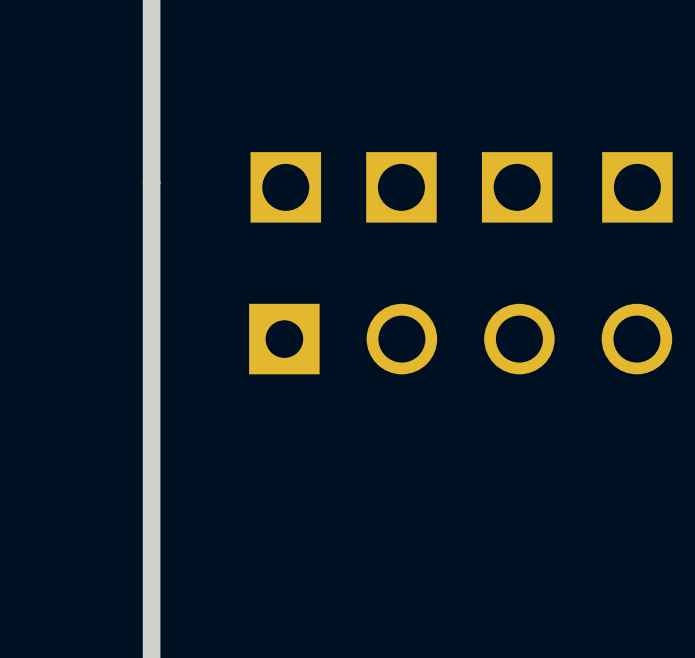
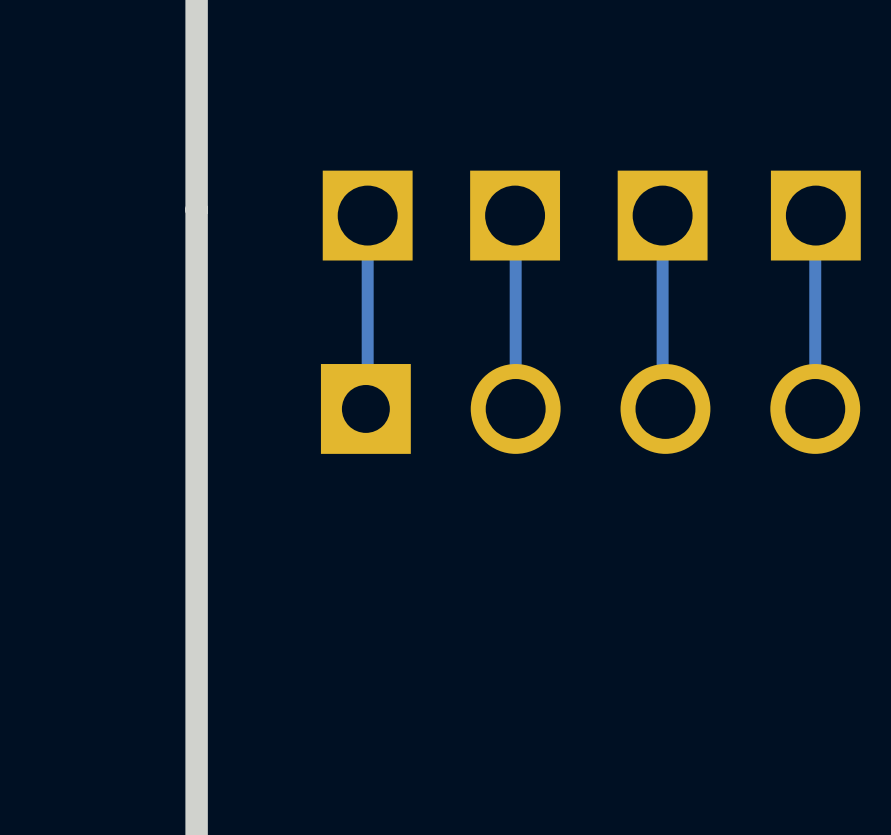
bottom track: none -> (367, 215) (367, 407) (365, 408)
bottom track: none -> (515, 216) (515, 408)
bottom track: none -> (662, 215) (662, 406) (665, 408)
bottom track: none -> (815, 216) (815, 408)

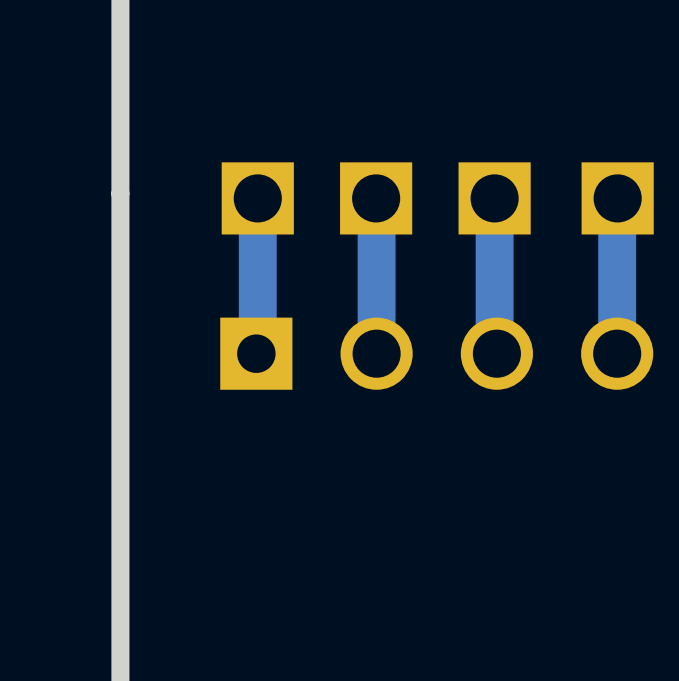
bottom track width: thin (367, 215) (367, 407) -> thick (257, 198) (257, 352)
bottom track width: thin (662, 215) (662, 406) -> thick (494, 198) (494, 351)
bottom track width: thin (515, 216) (515, 408) -> thick (376, 198) (376, 353)
bottom track width: thin (815, 216) (815, 408) -> thick (617, 198) (617, 353)

